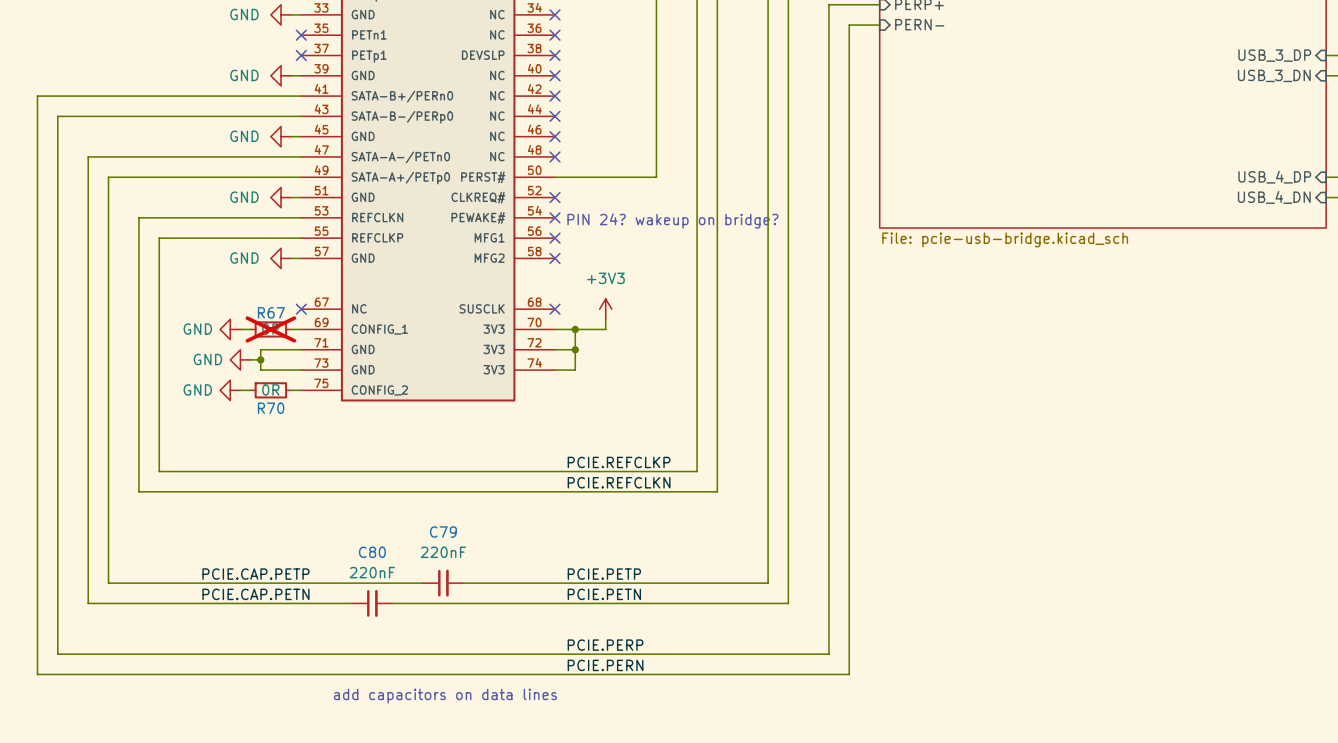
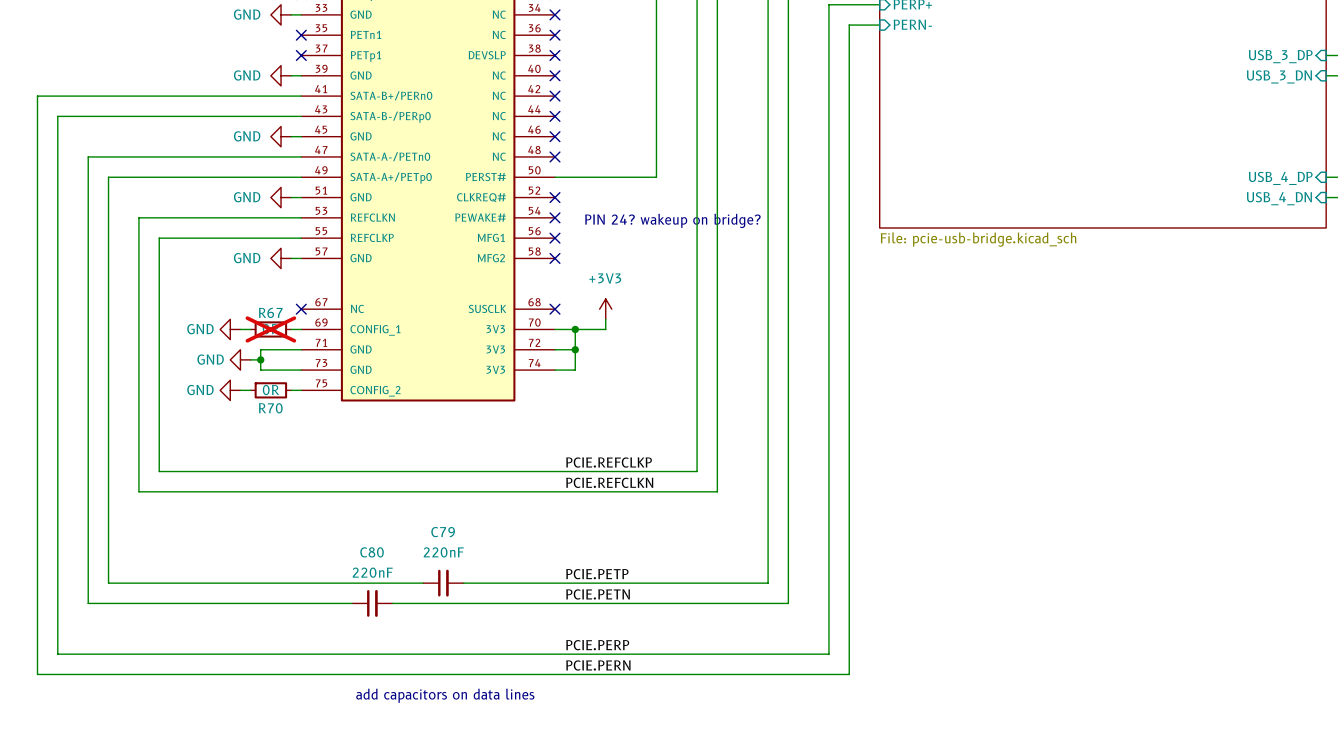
label: PCIE.CAP.PETP (255, 574) -> none
label: PCIE.CAP.PETN (255, 594) -> none

